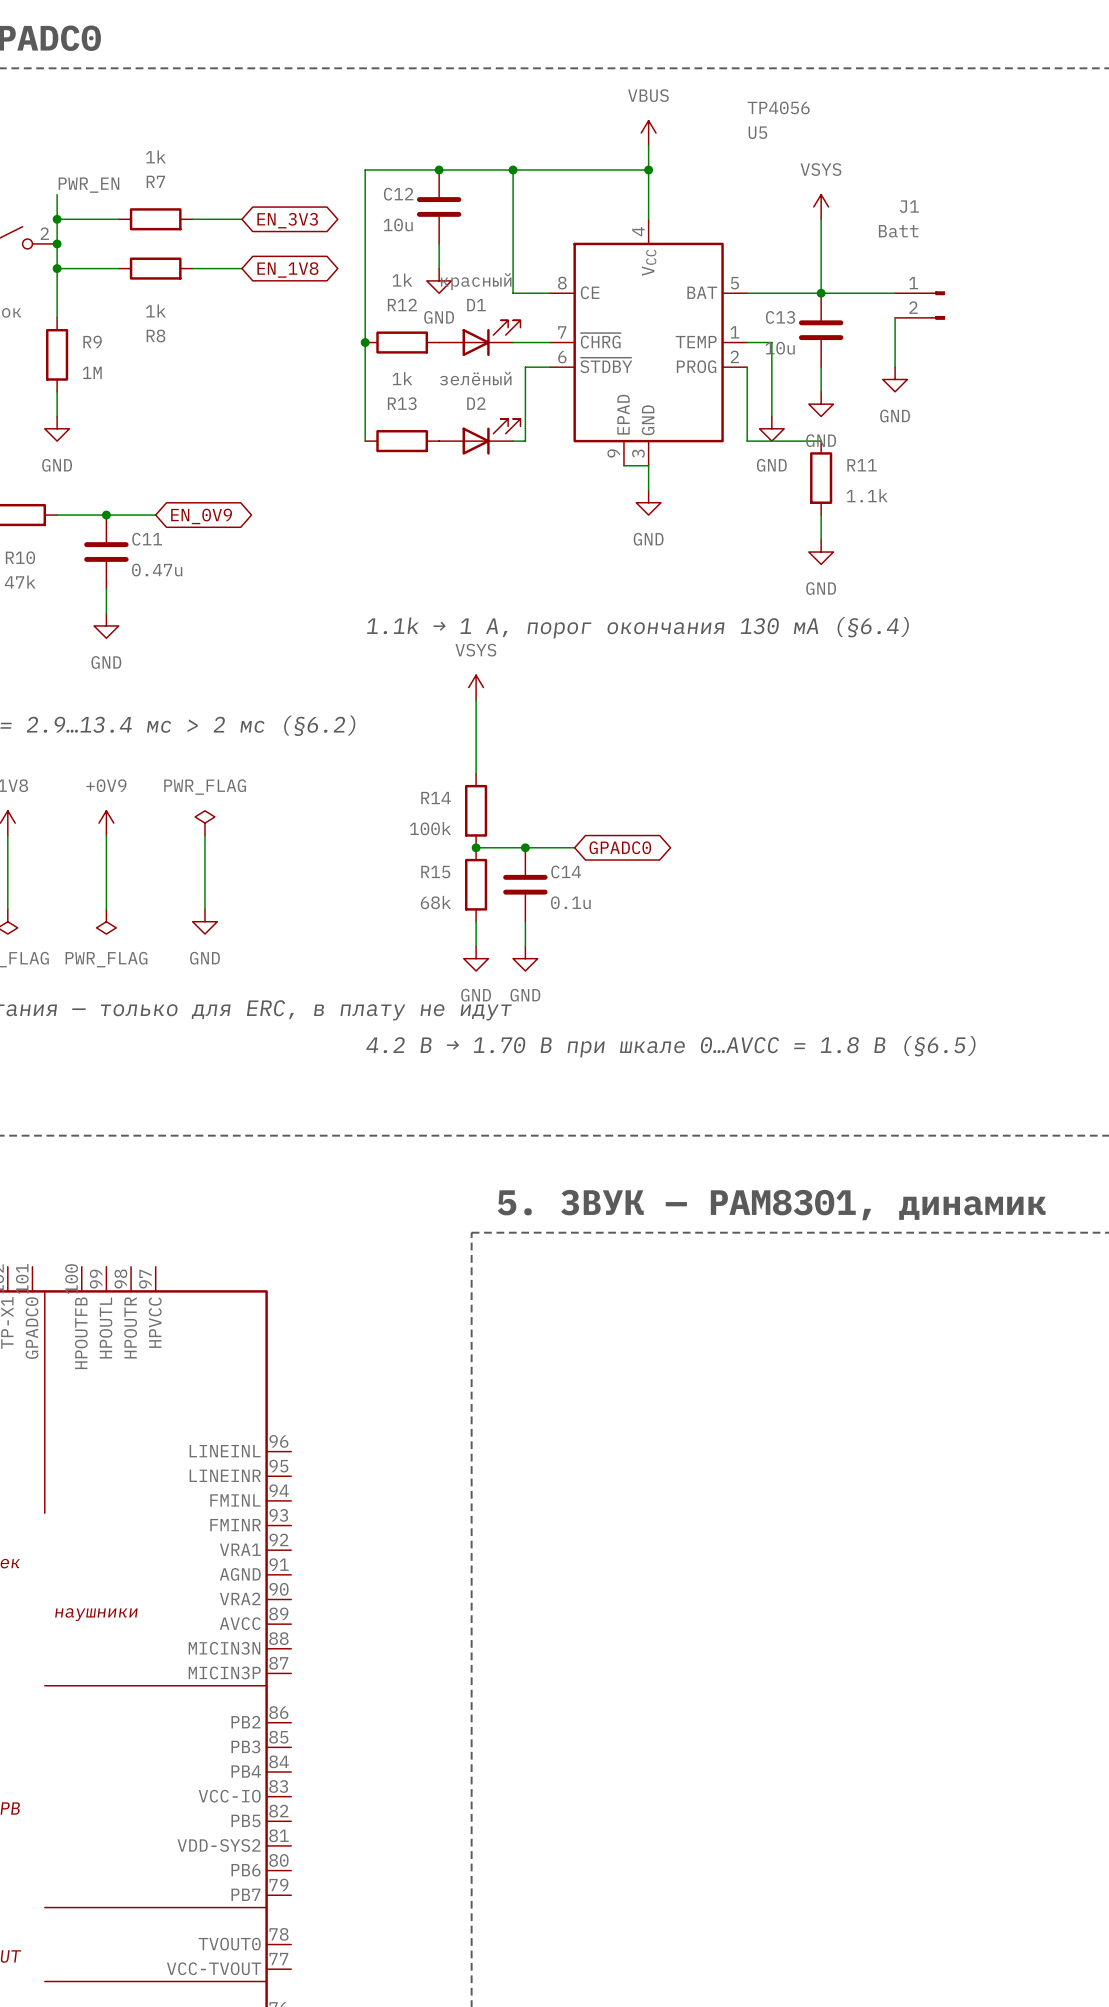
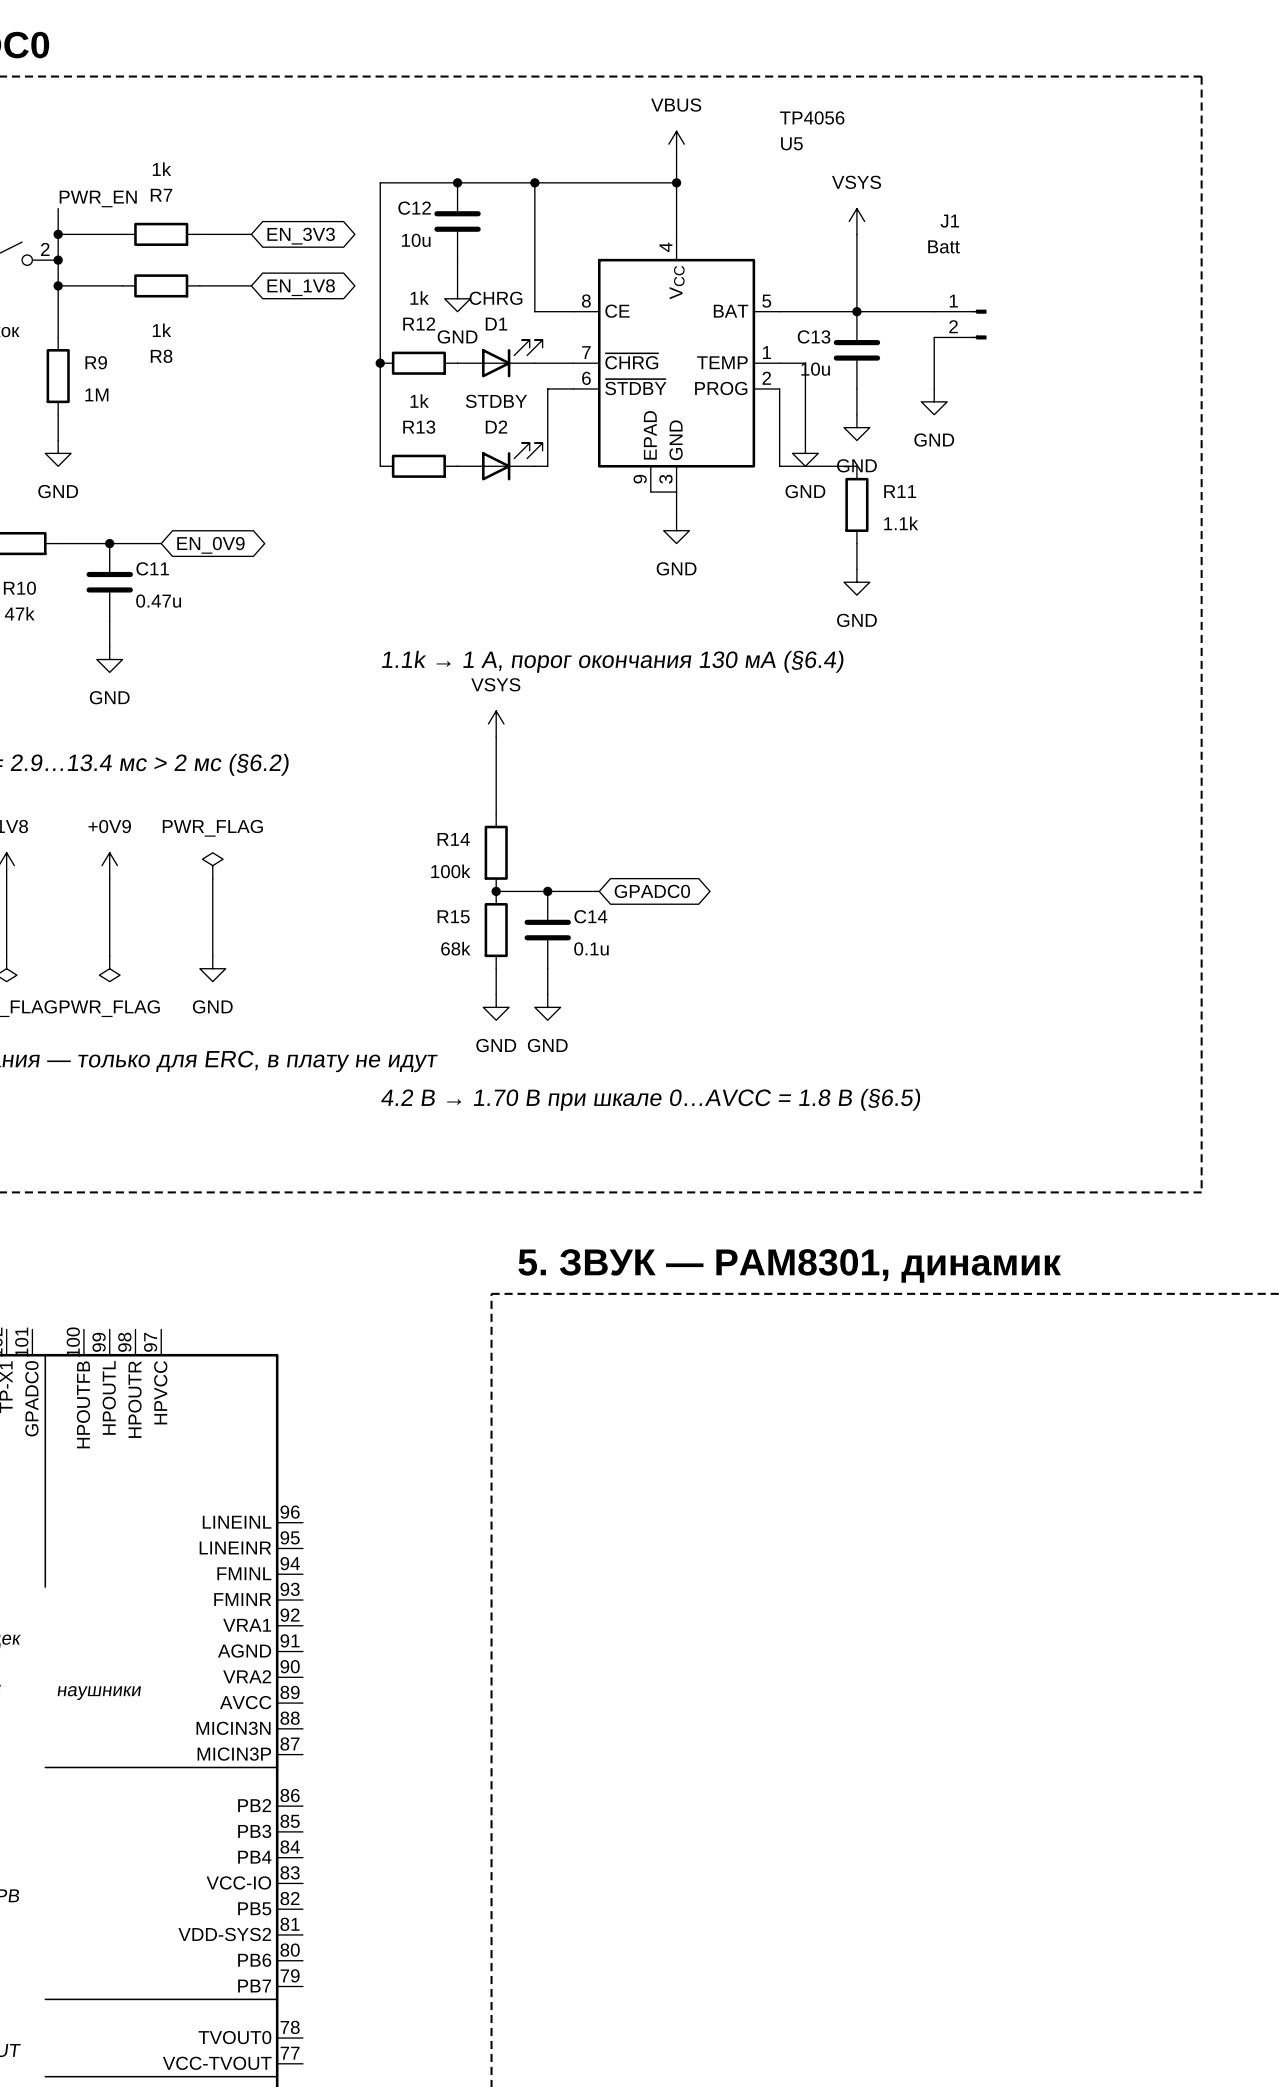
D1 value: красный (476, 281) -> CHRG (495, 298)
D2 value: зелёный (475, 378) -> STDBY (496, 401)

